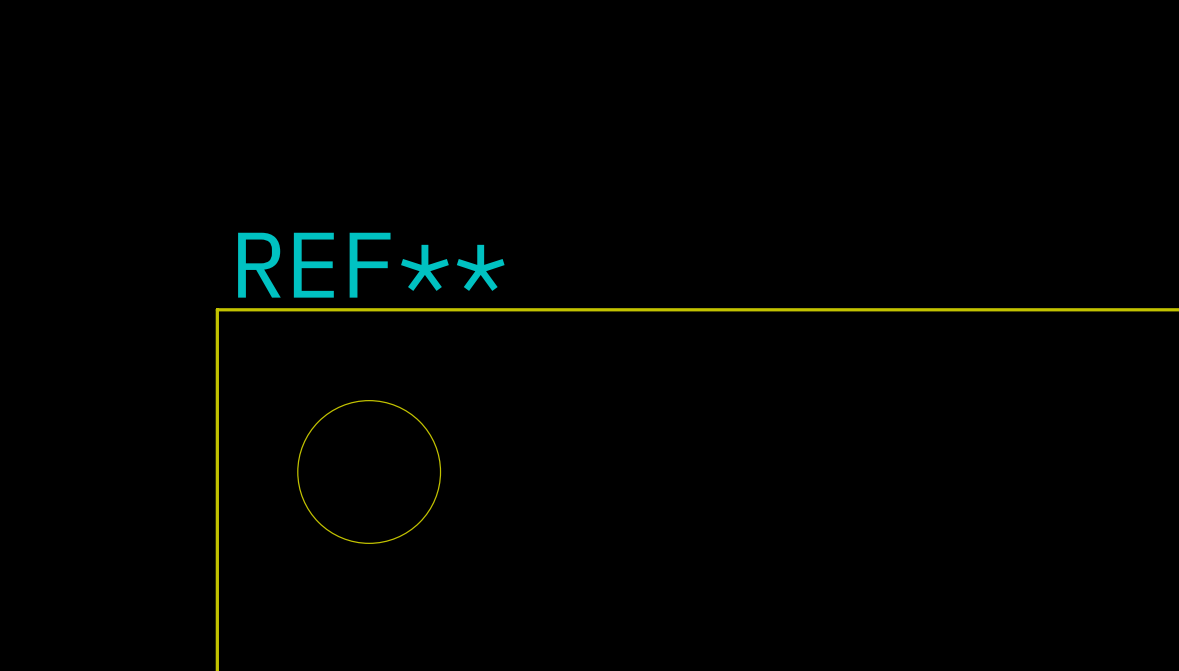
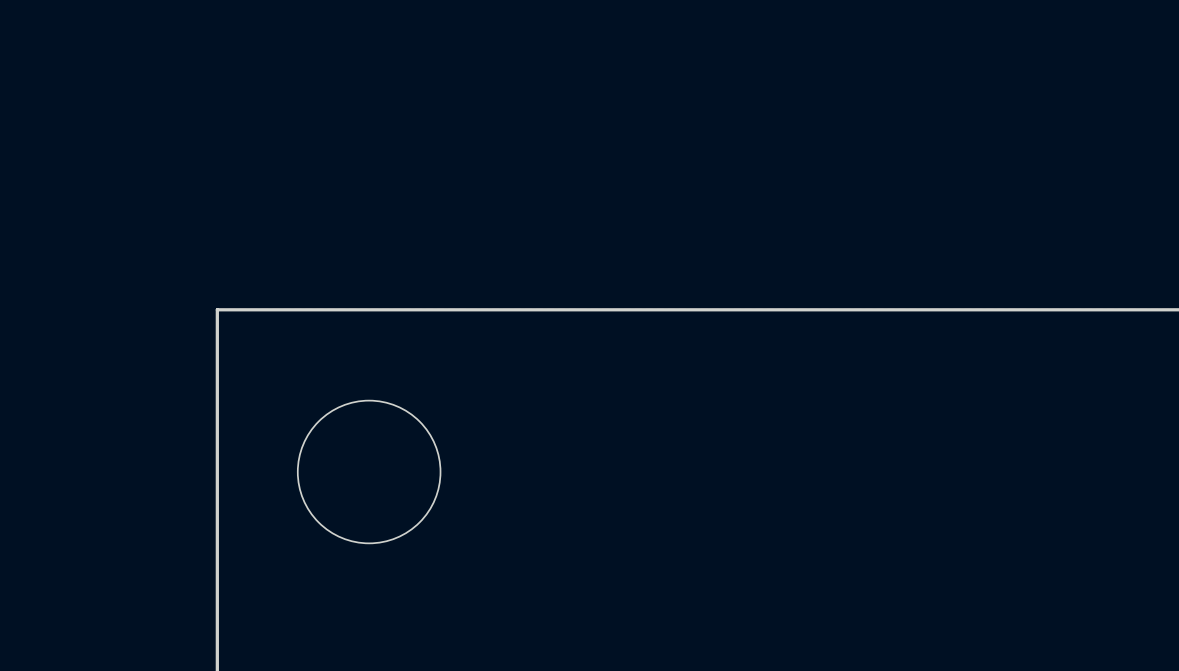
REF** name: REF** (371, 265) -> none

